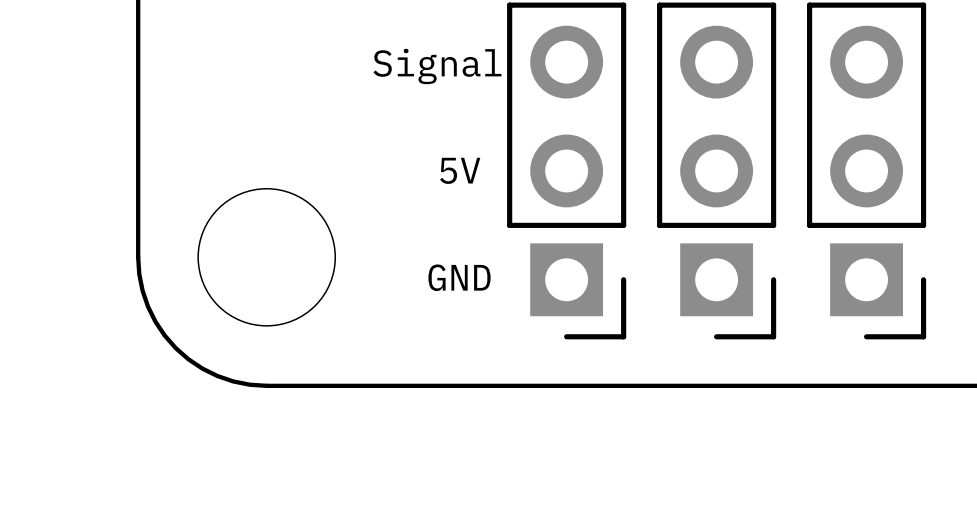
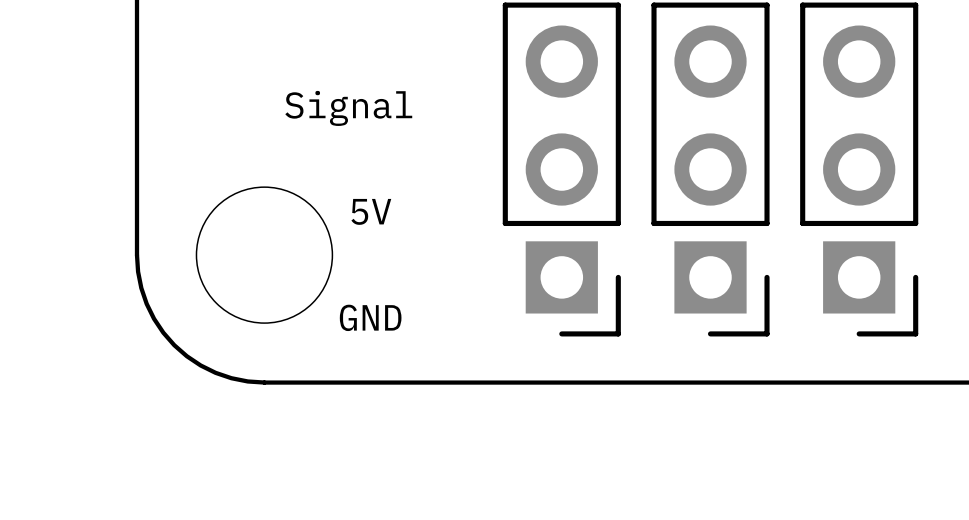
text position: Signal (437, 66) -> Signal (348, 108)
text position: 5V (460, 170) -> 5V (371, 211)
text position: GND (459, 277) -> GND (370, 317)

